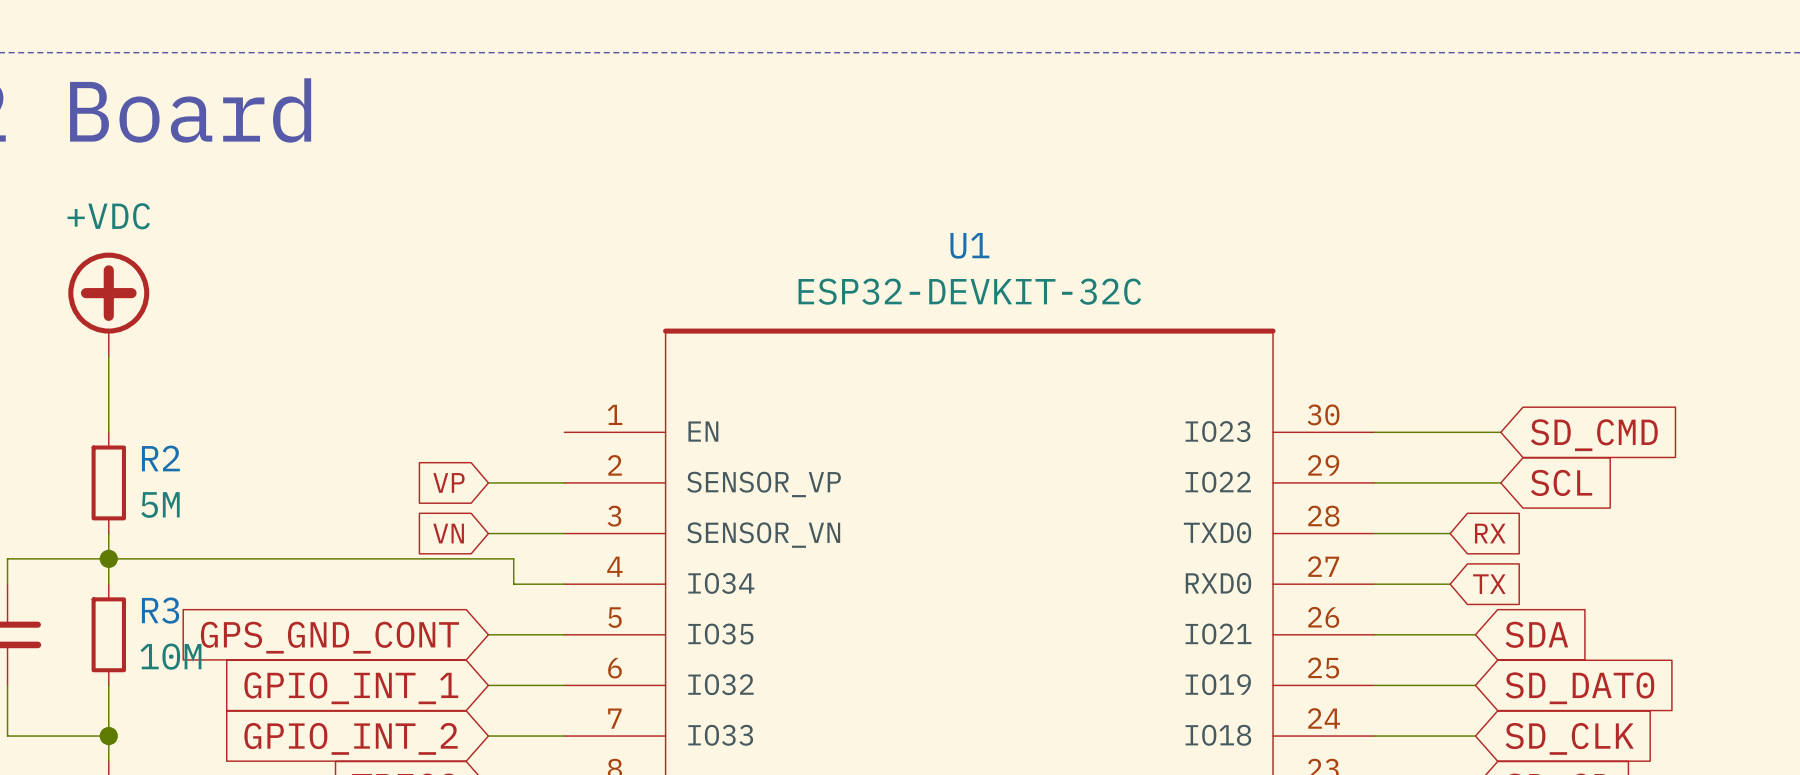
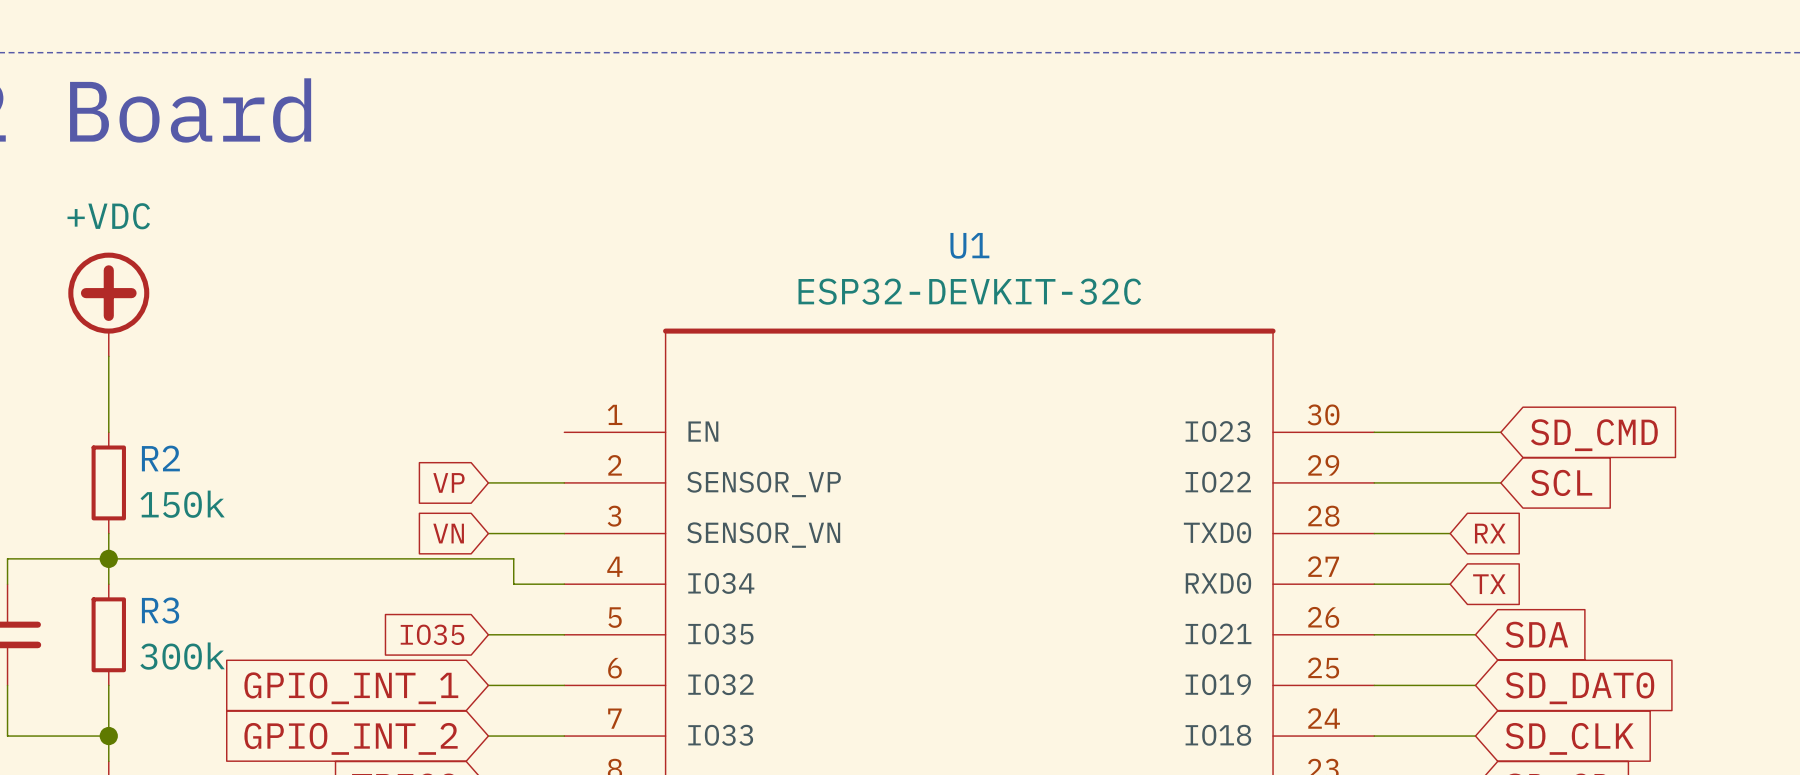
R2 value: 5M (160, 504) -> 150k (182, 504)
global label: GPS_GND_CONT (329, 637) -> IO35 (432, 634)
R3 value: 10M (171, 656) -> 300k (182, 656)

